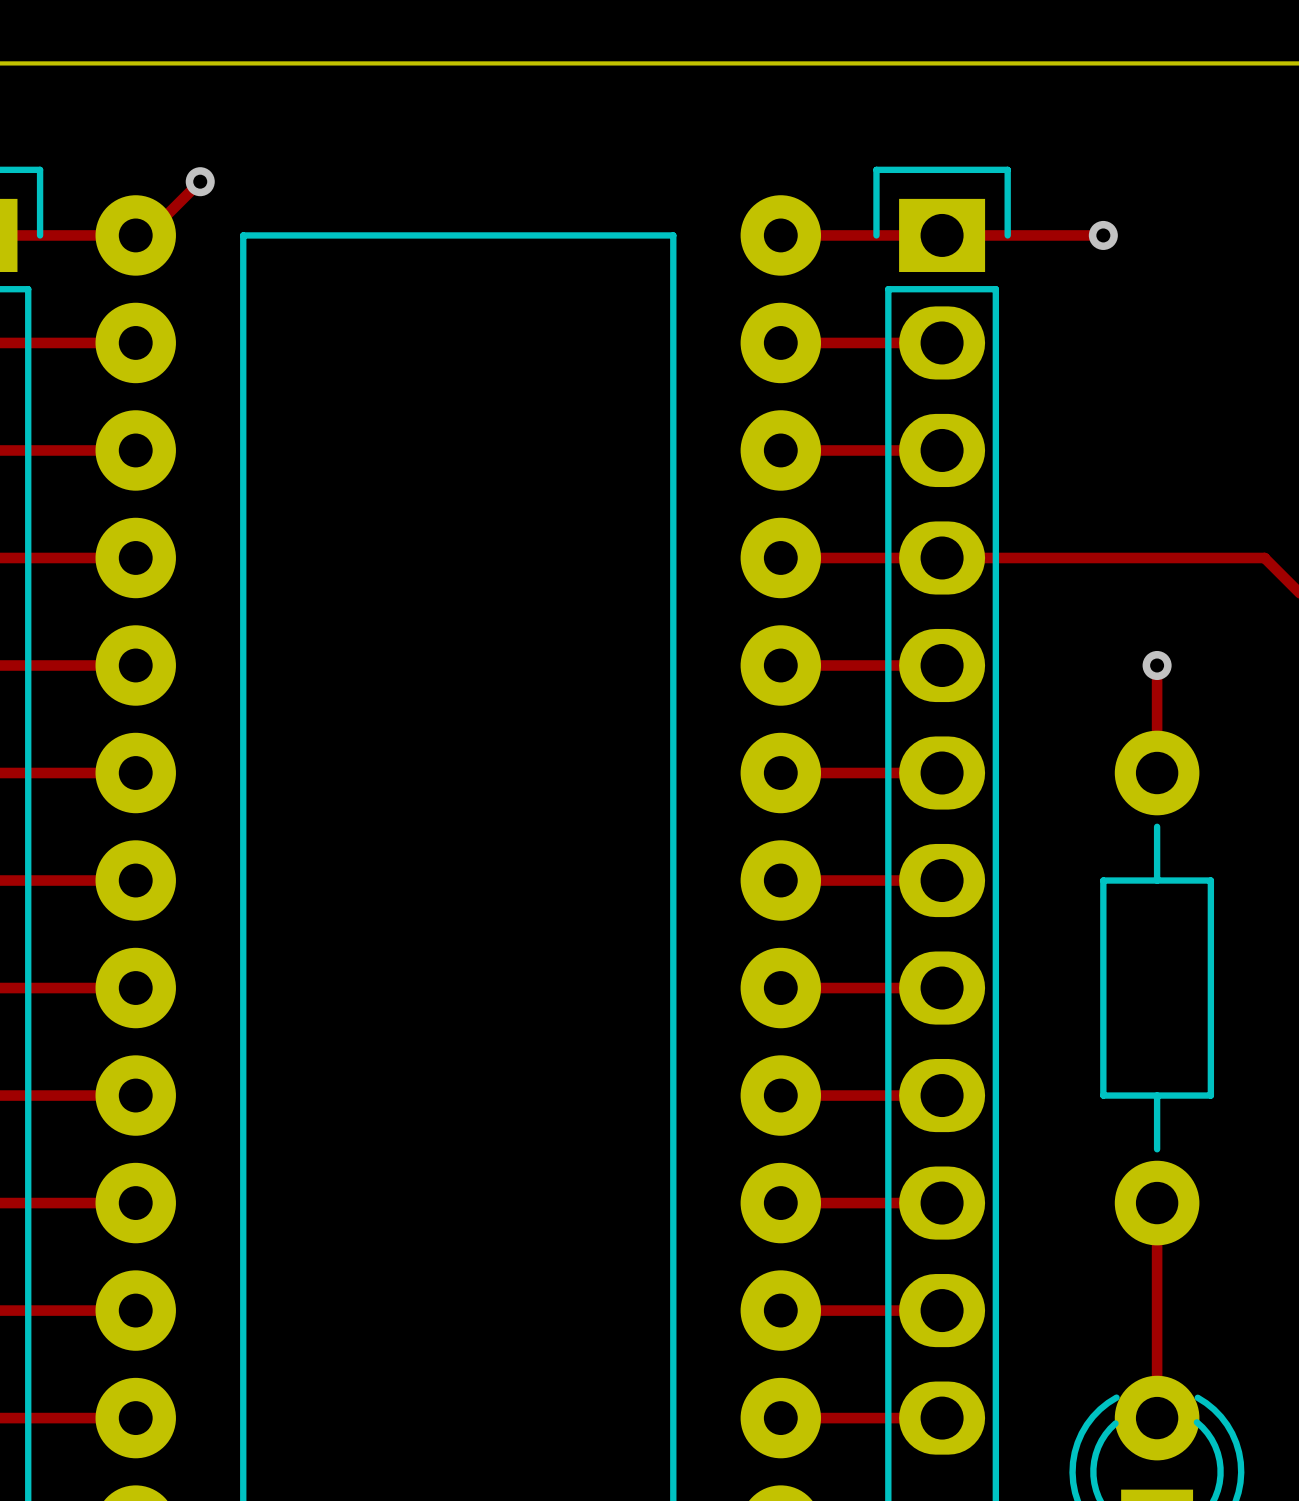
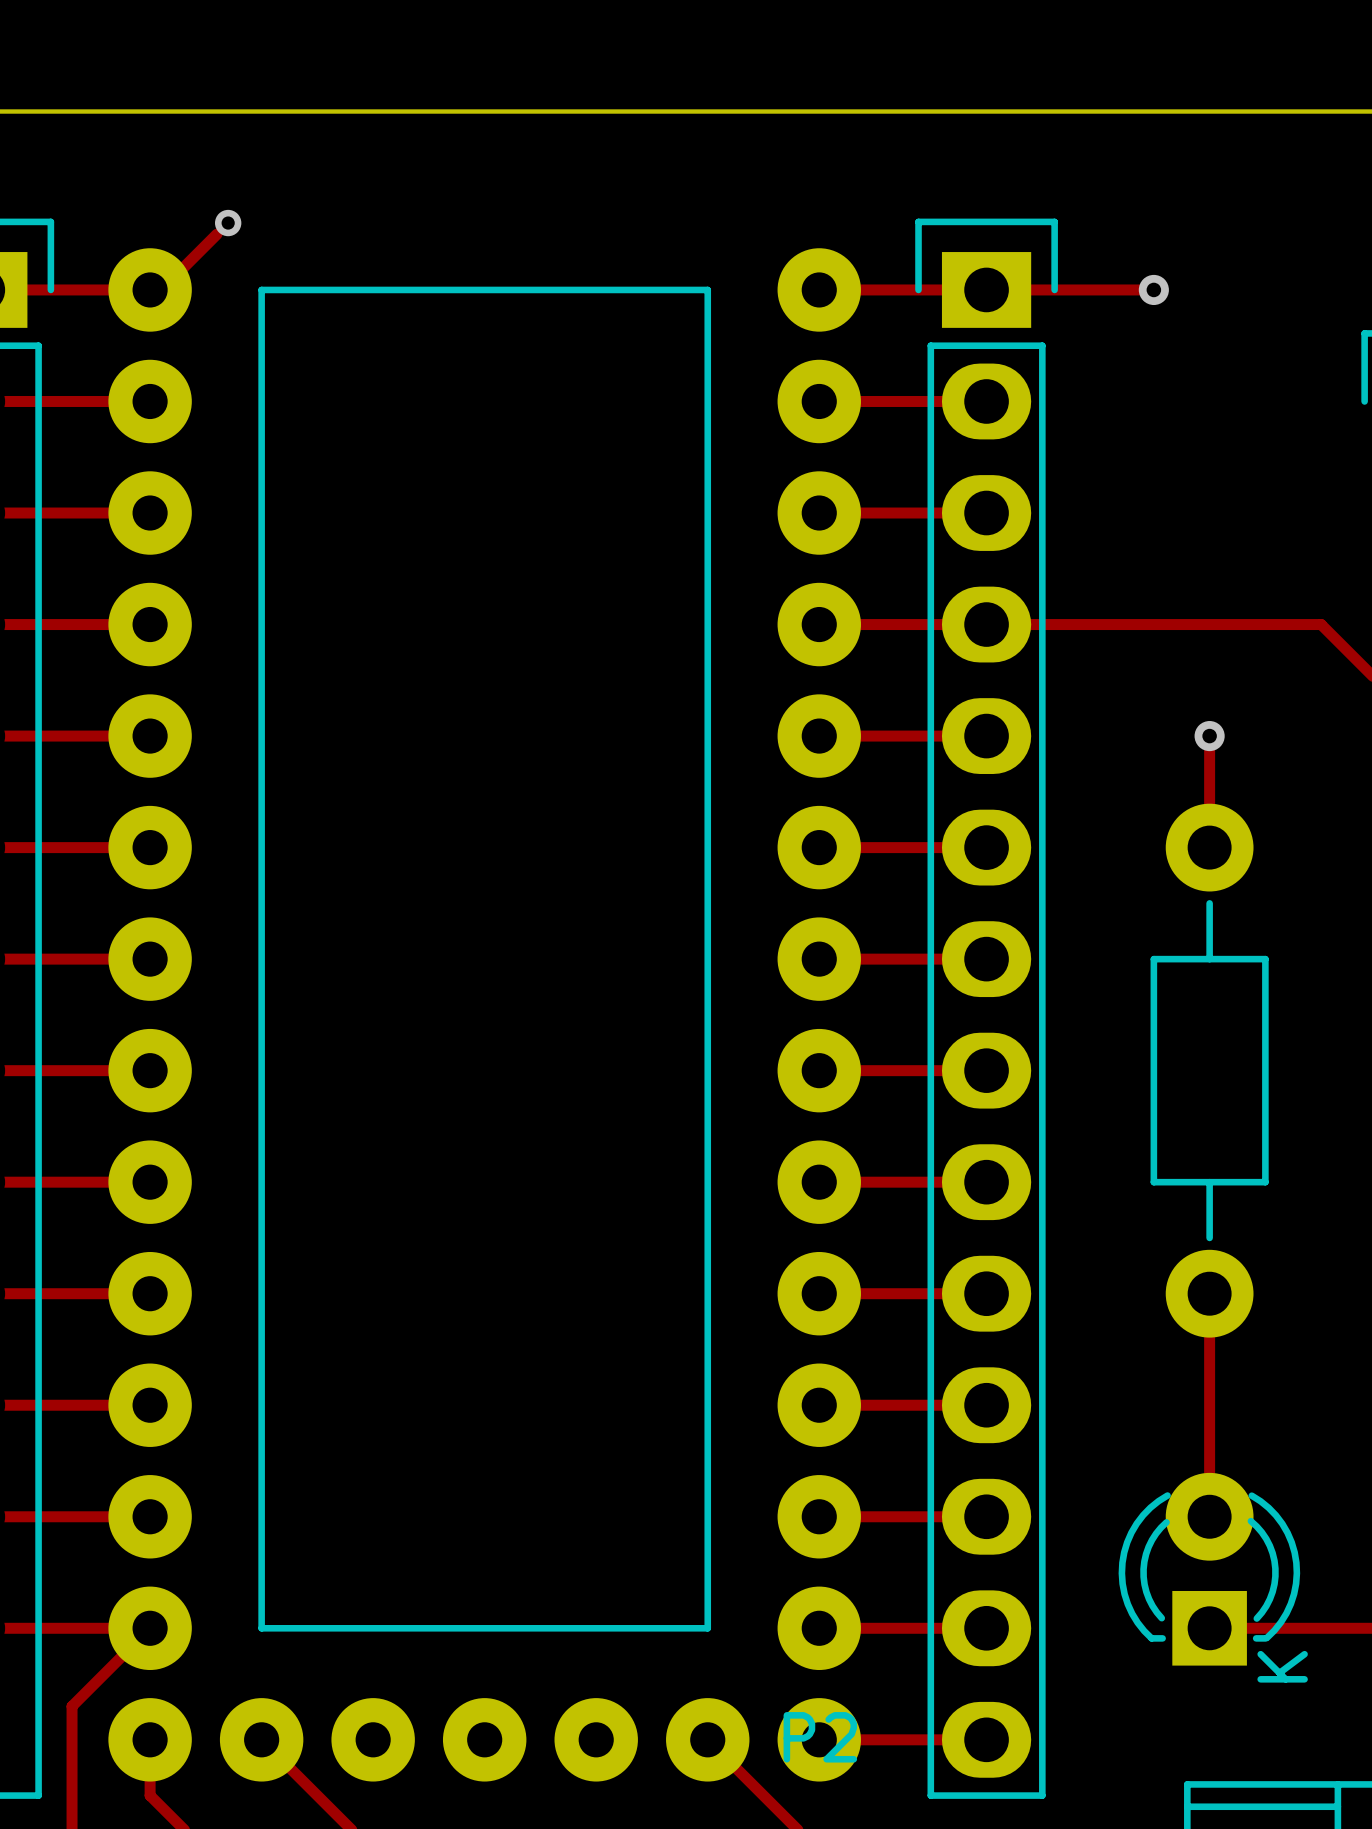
via position: (200, 181) -> (228, 223)

